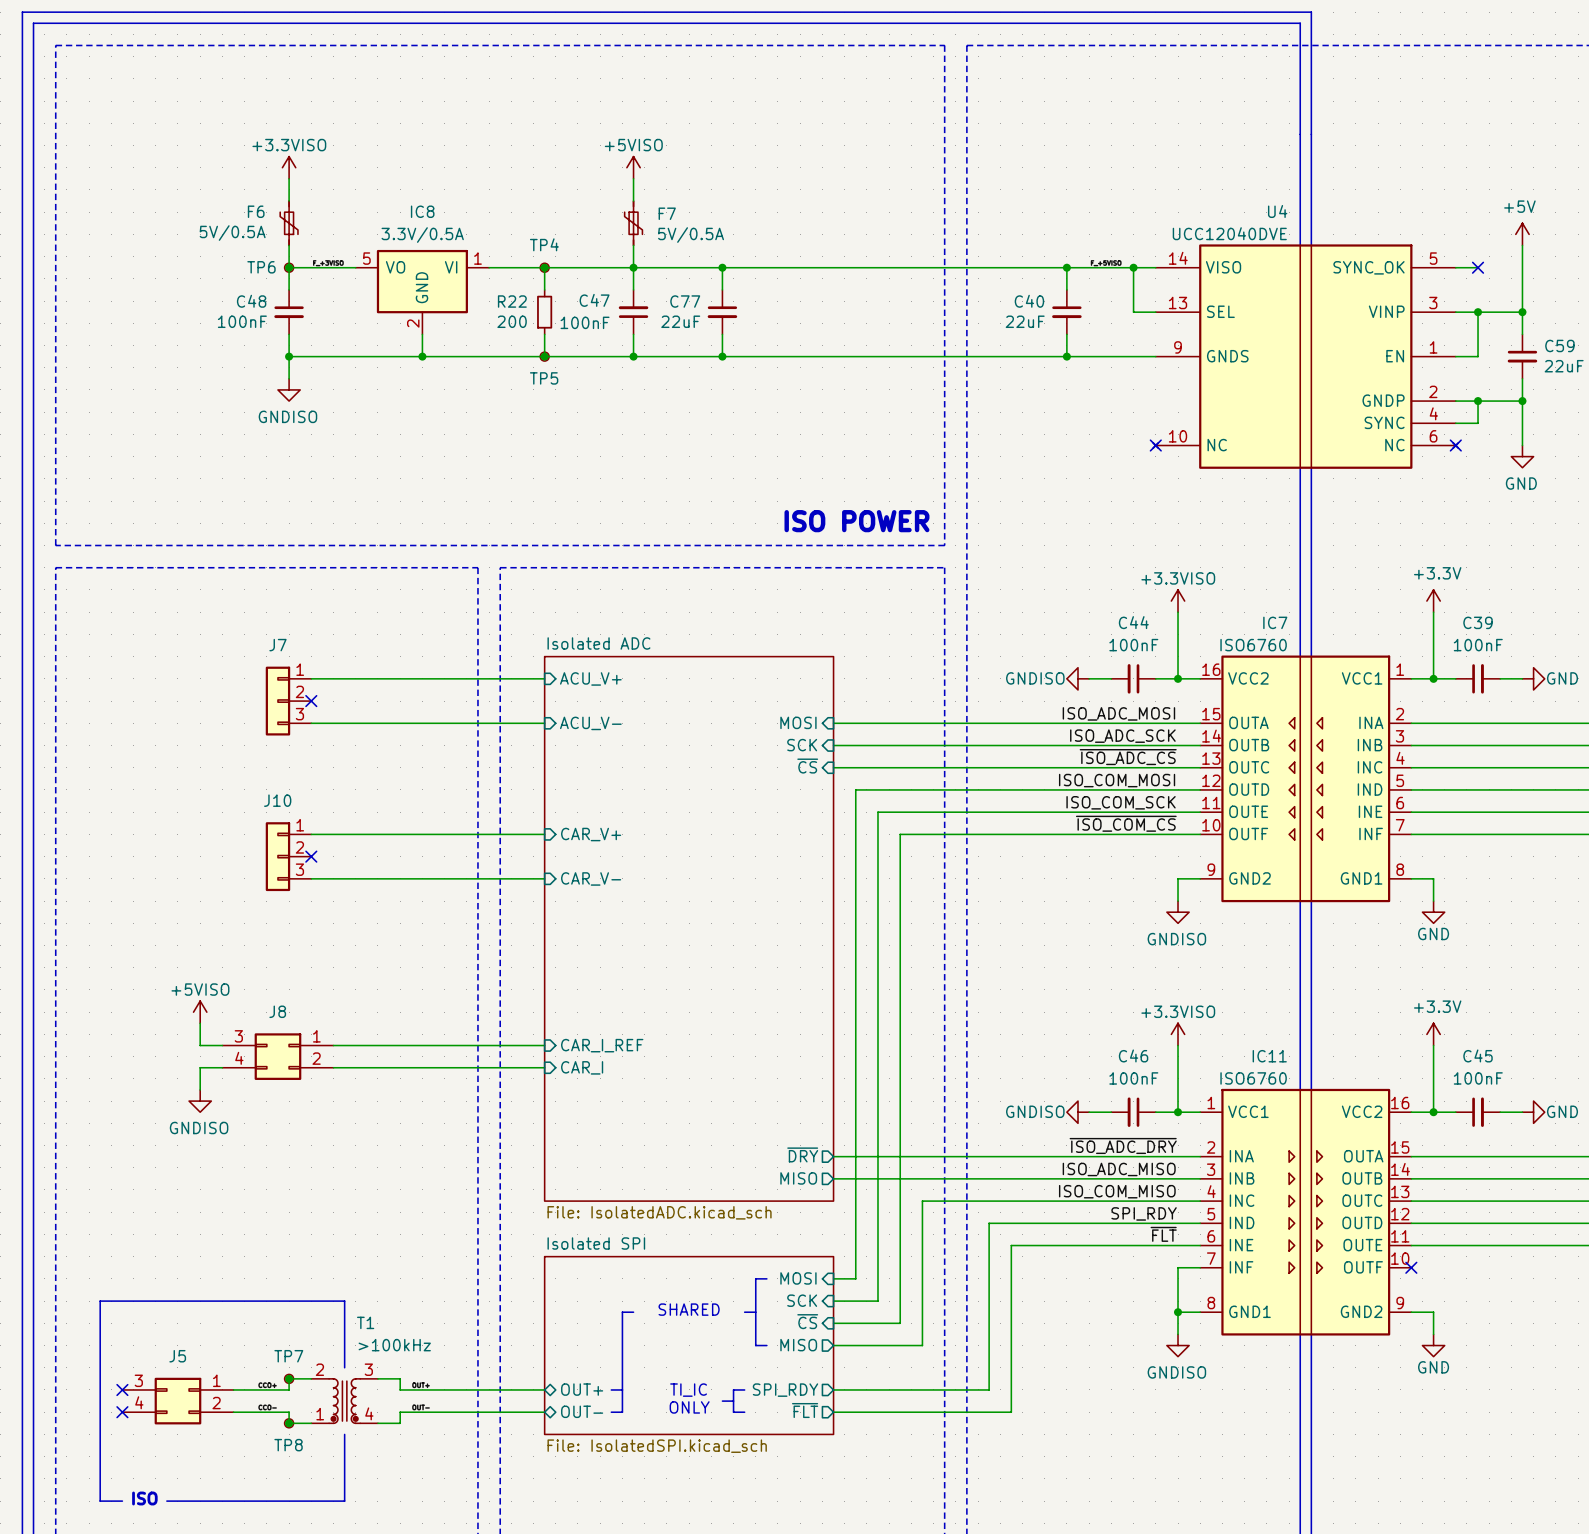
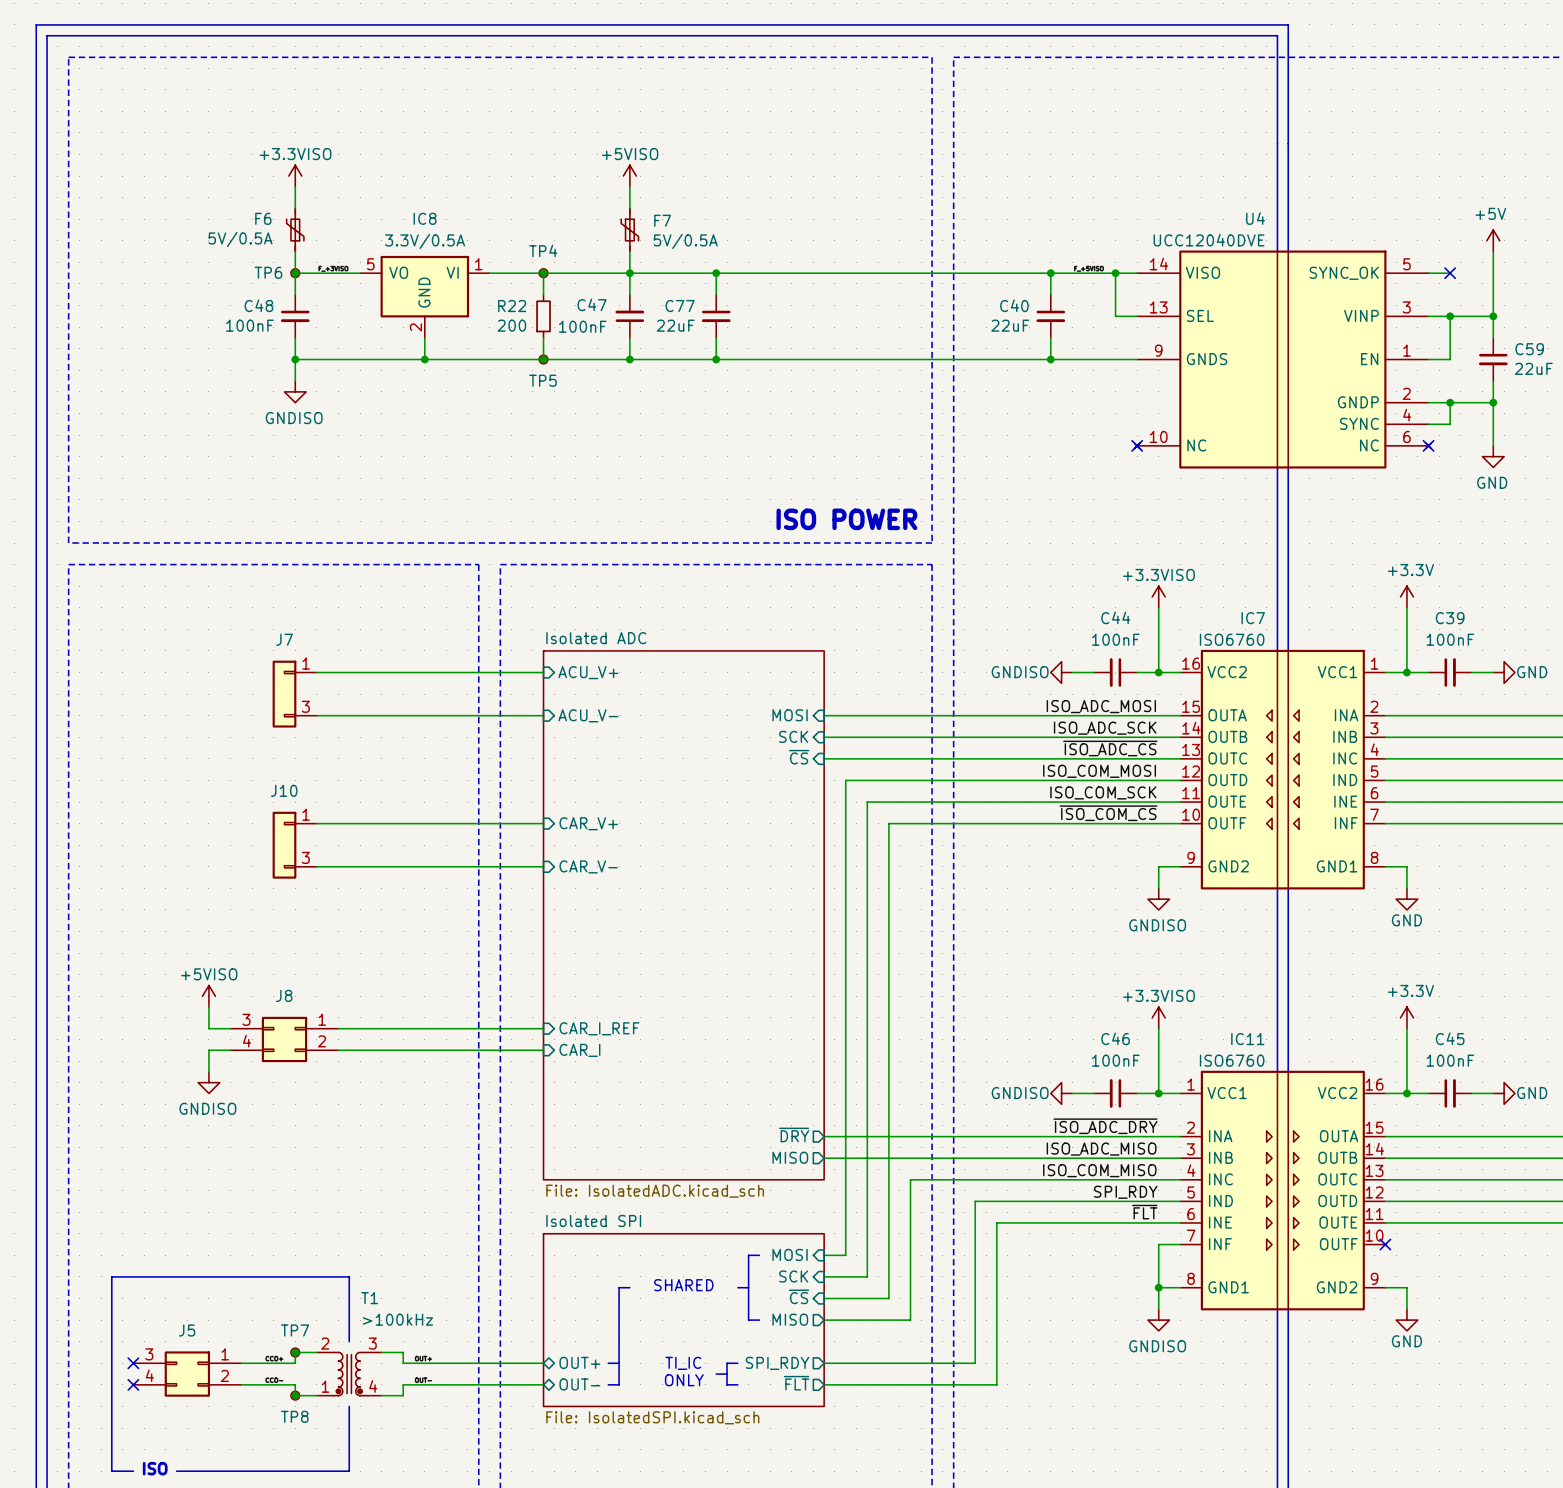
J7 symbol: [265, 666, 312, 736] -> [272, 660, 317, 728]
no-connect mark: (311, 701) -> none
J10 symbol: [265, 822, 312, 892] -> [272, 811, 317, 879]
no-connect mark: (311, 856) -> none

